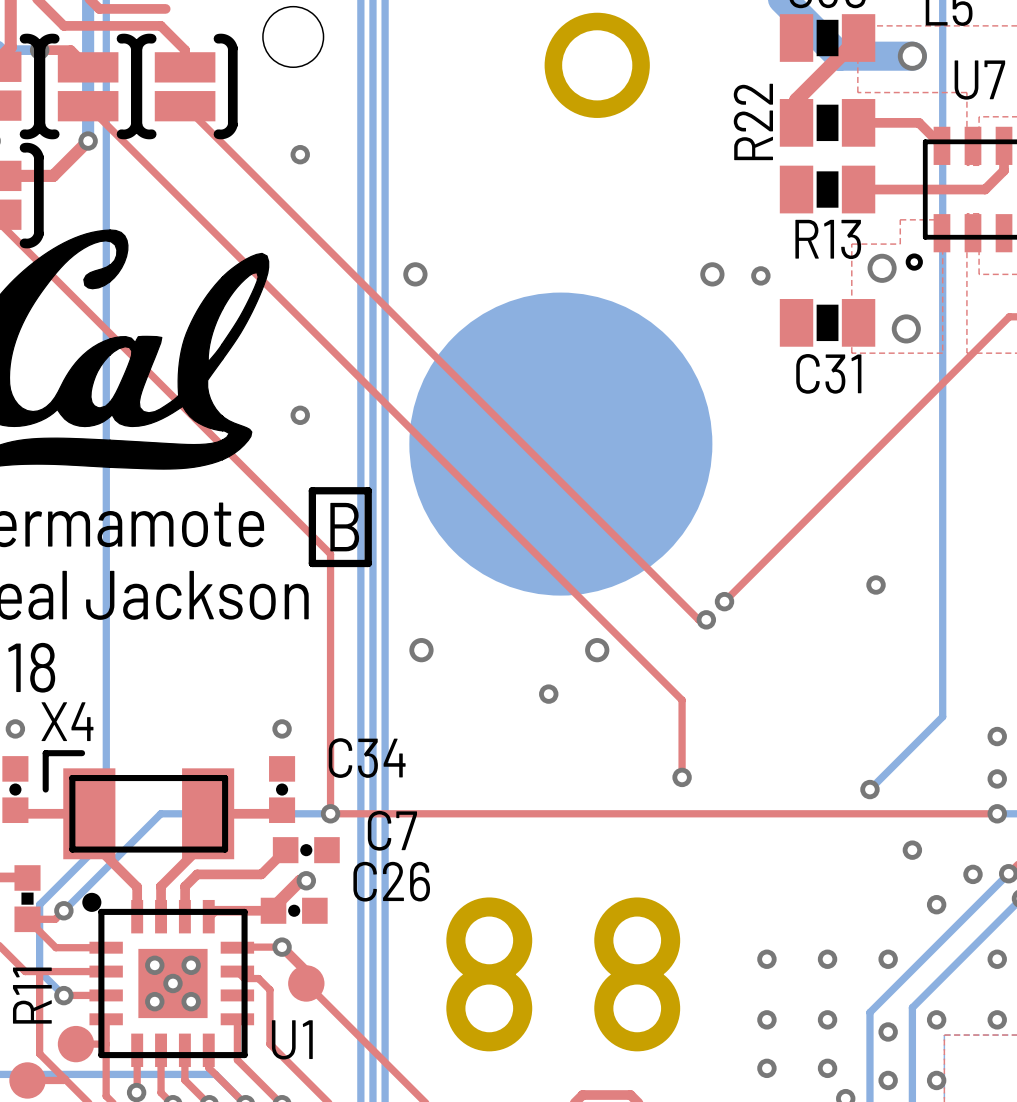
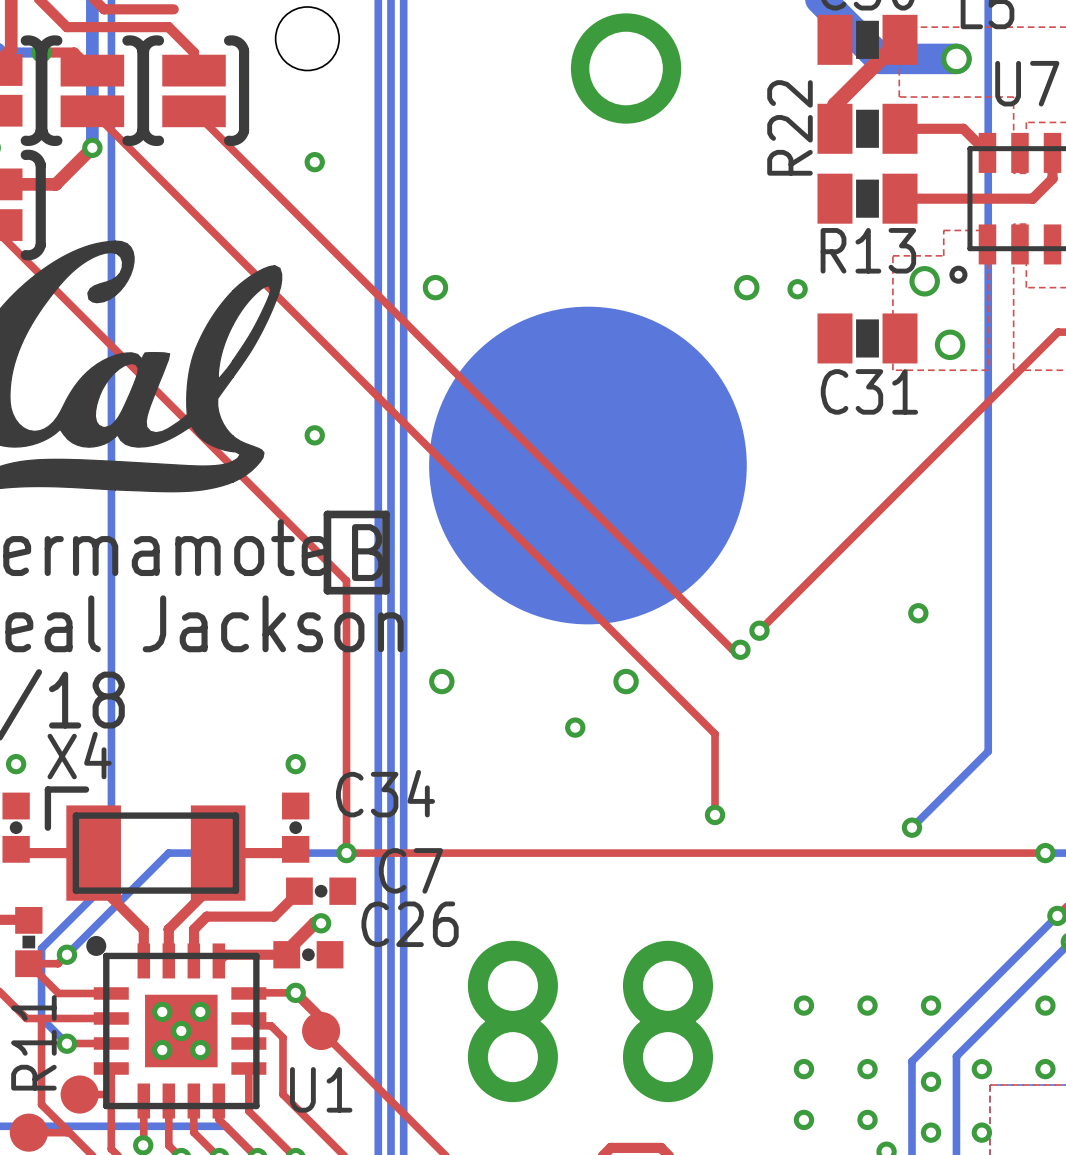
via: (997, 736) -> none
via: (997, 778) -> none
via: (912, 850) -> none
via: (973, 874) -> none
via: (936, 904) -> none

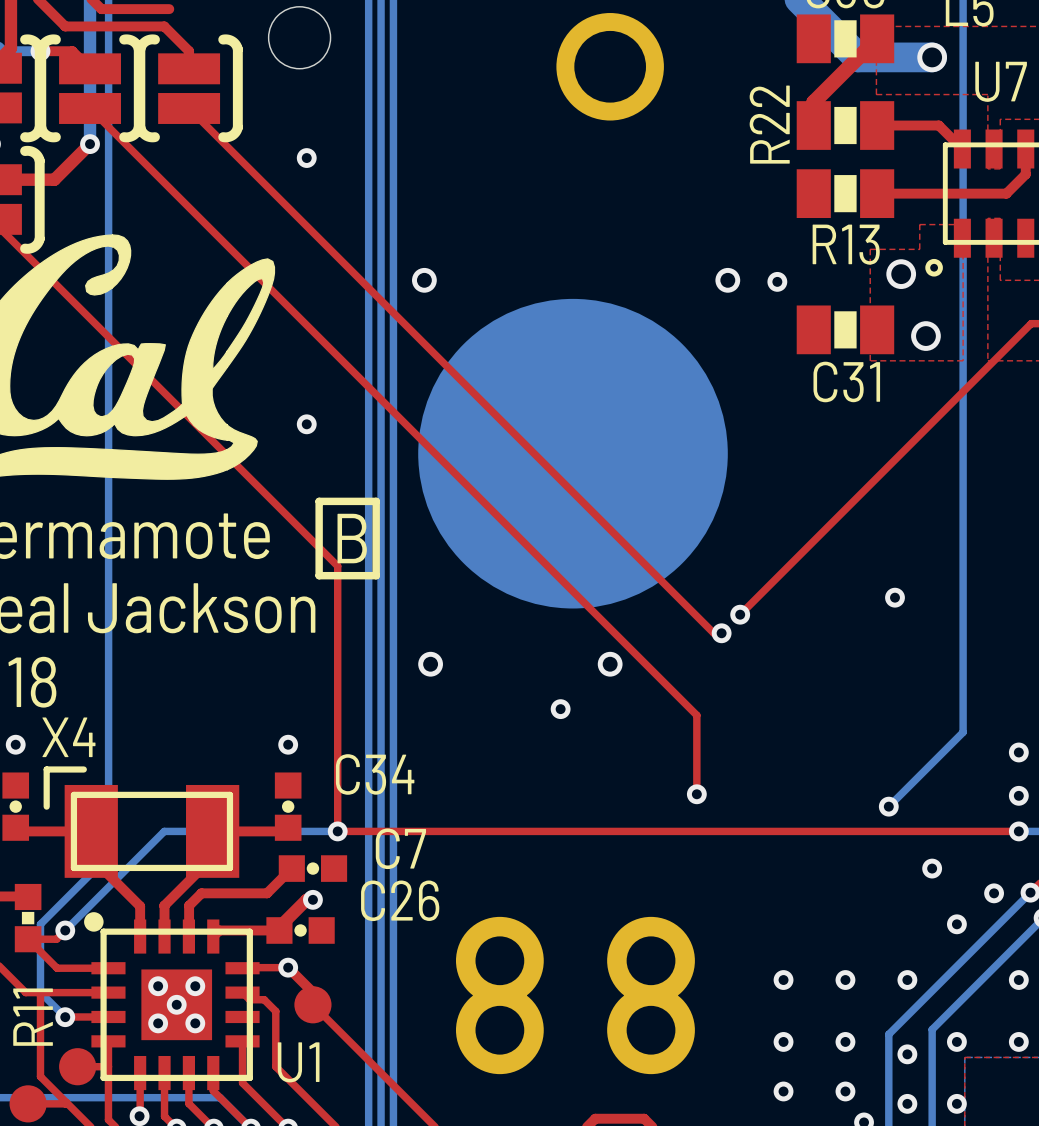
via: none -> (1018, 752)
via: none -> (1018, 795)
via: none -> (932, 868)
via: none -> (994, 893)
via: none -> (956, 924)

